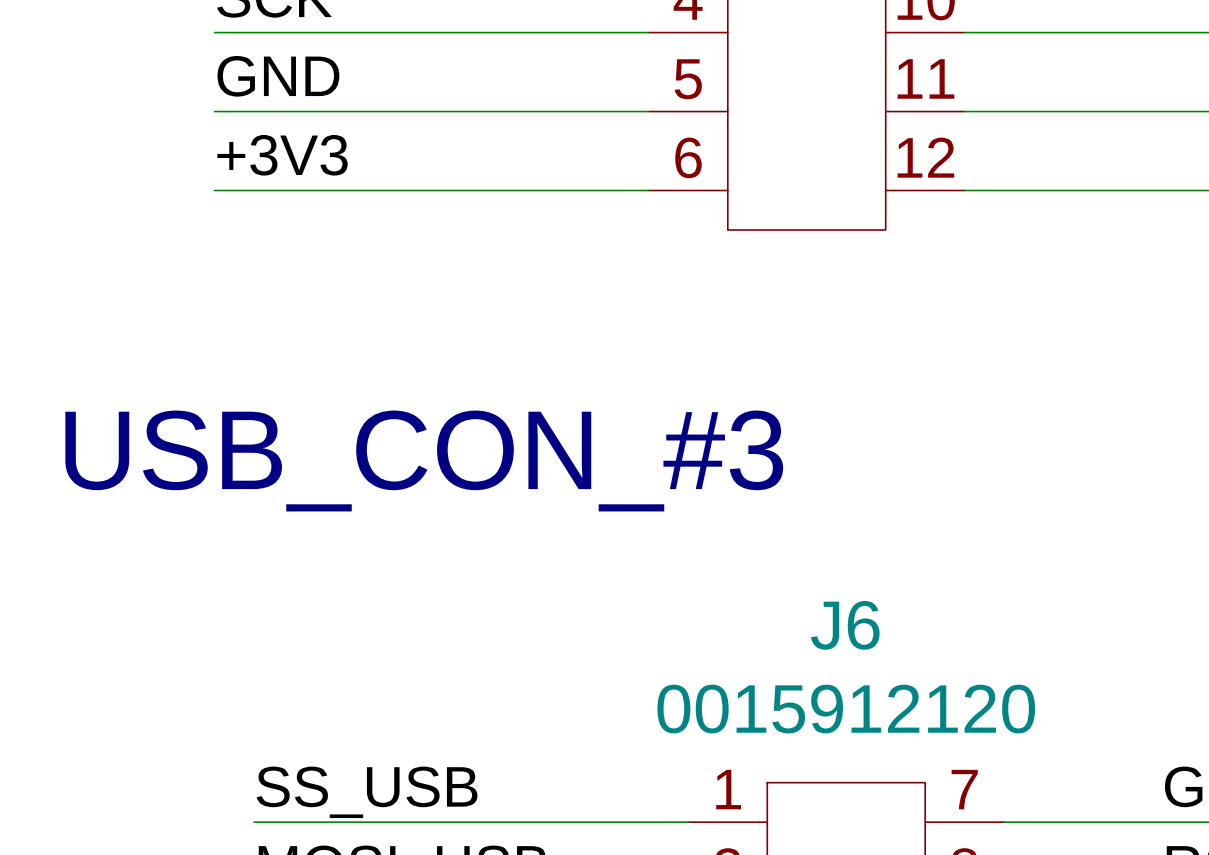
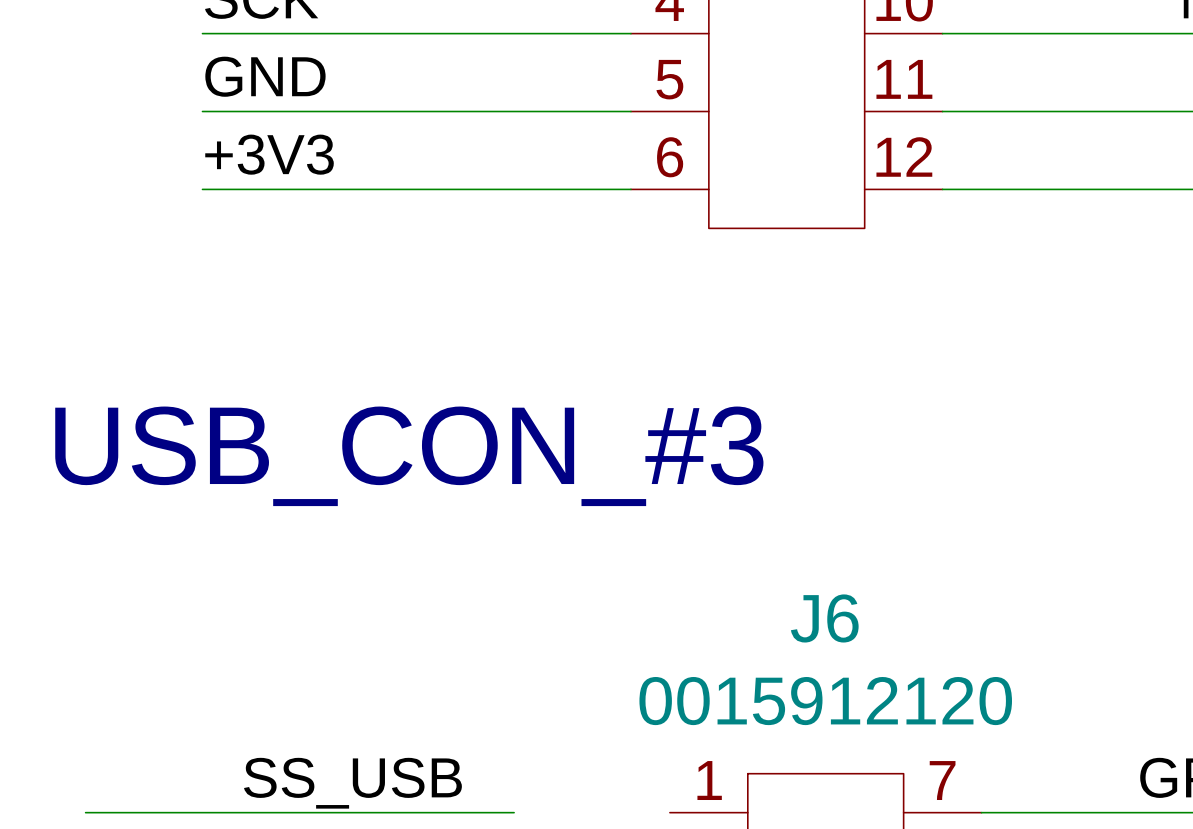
wire: (530, 822) (688, 822) -> (85, 812) (241, 812)

